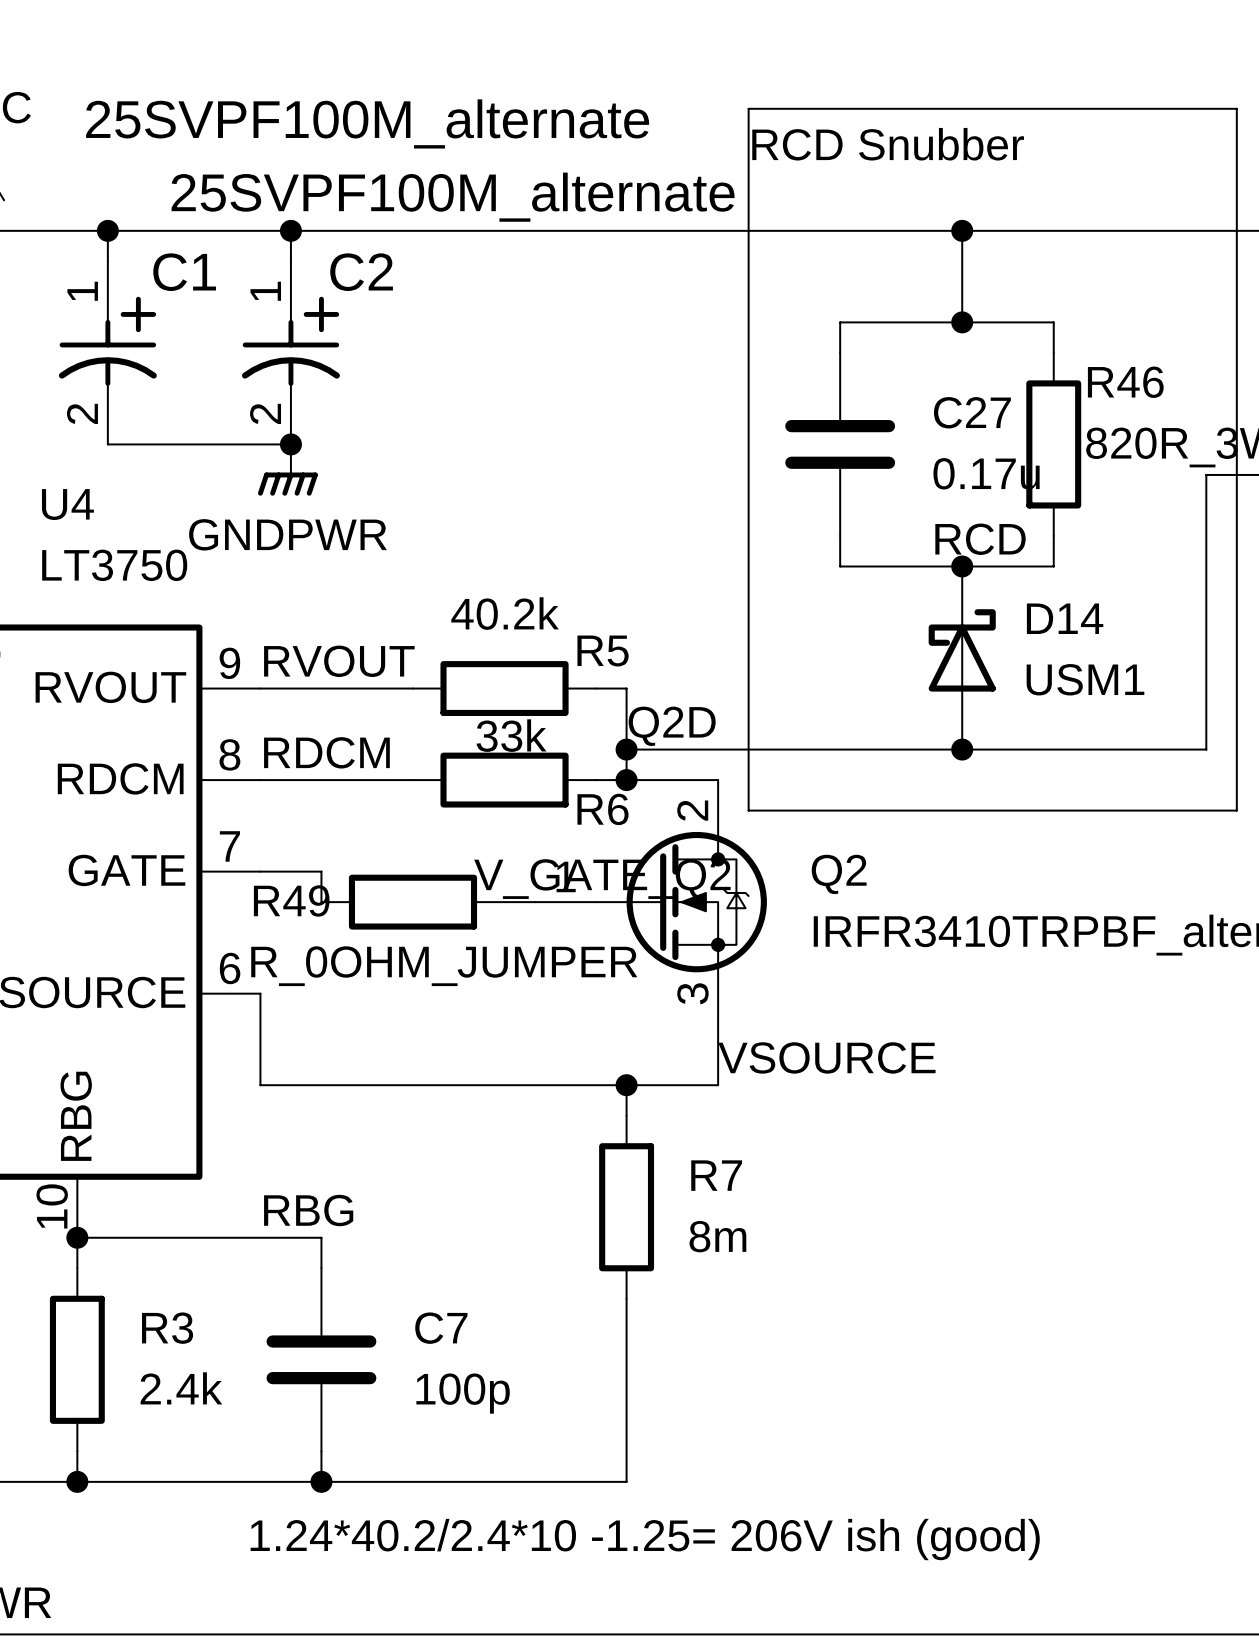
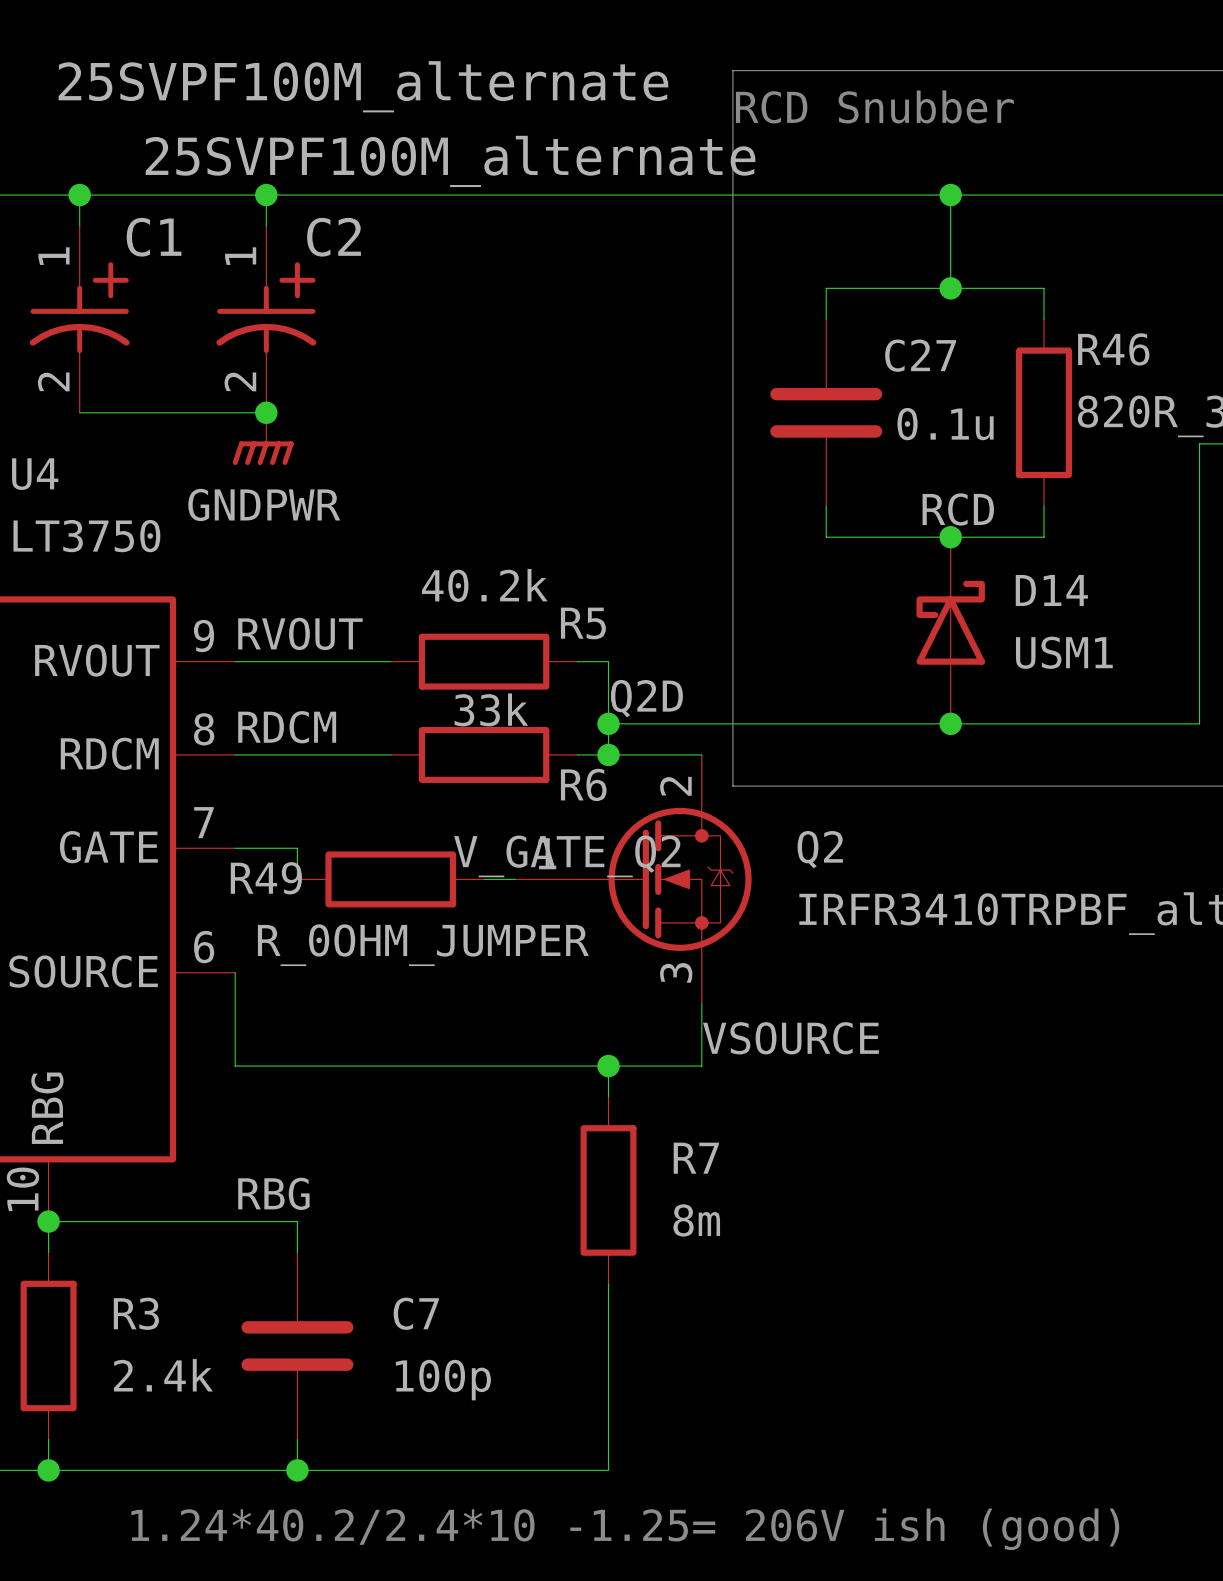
C27 name position: C27 (972, 412) -> C27 (920, 355)
C27 value: 0.17u (986, 473) -> 0.1u (945, 424)

